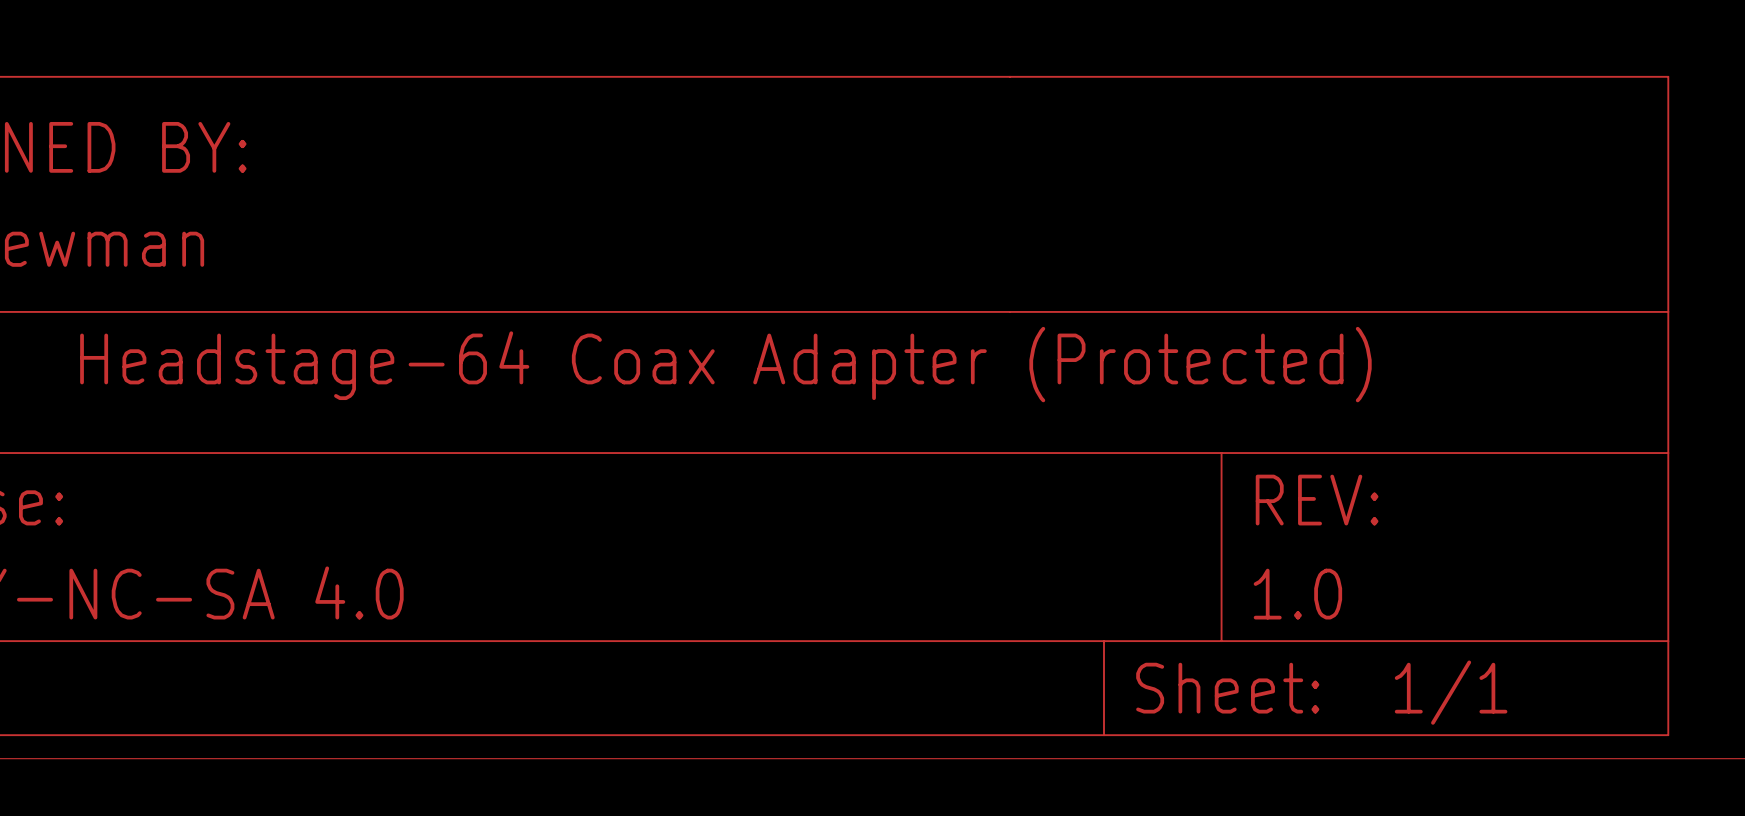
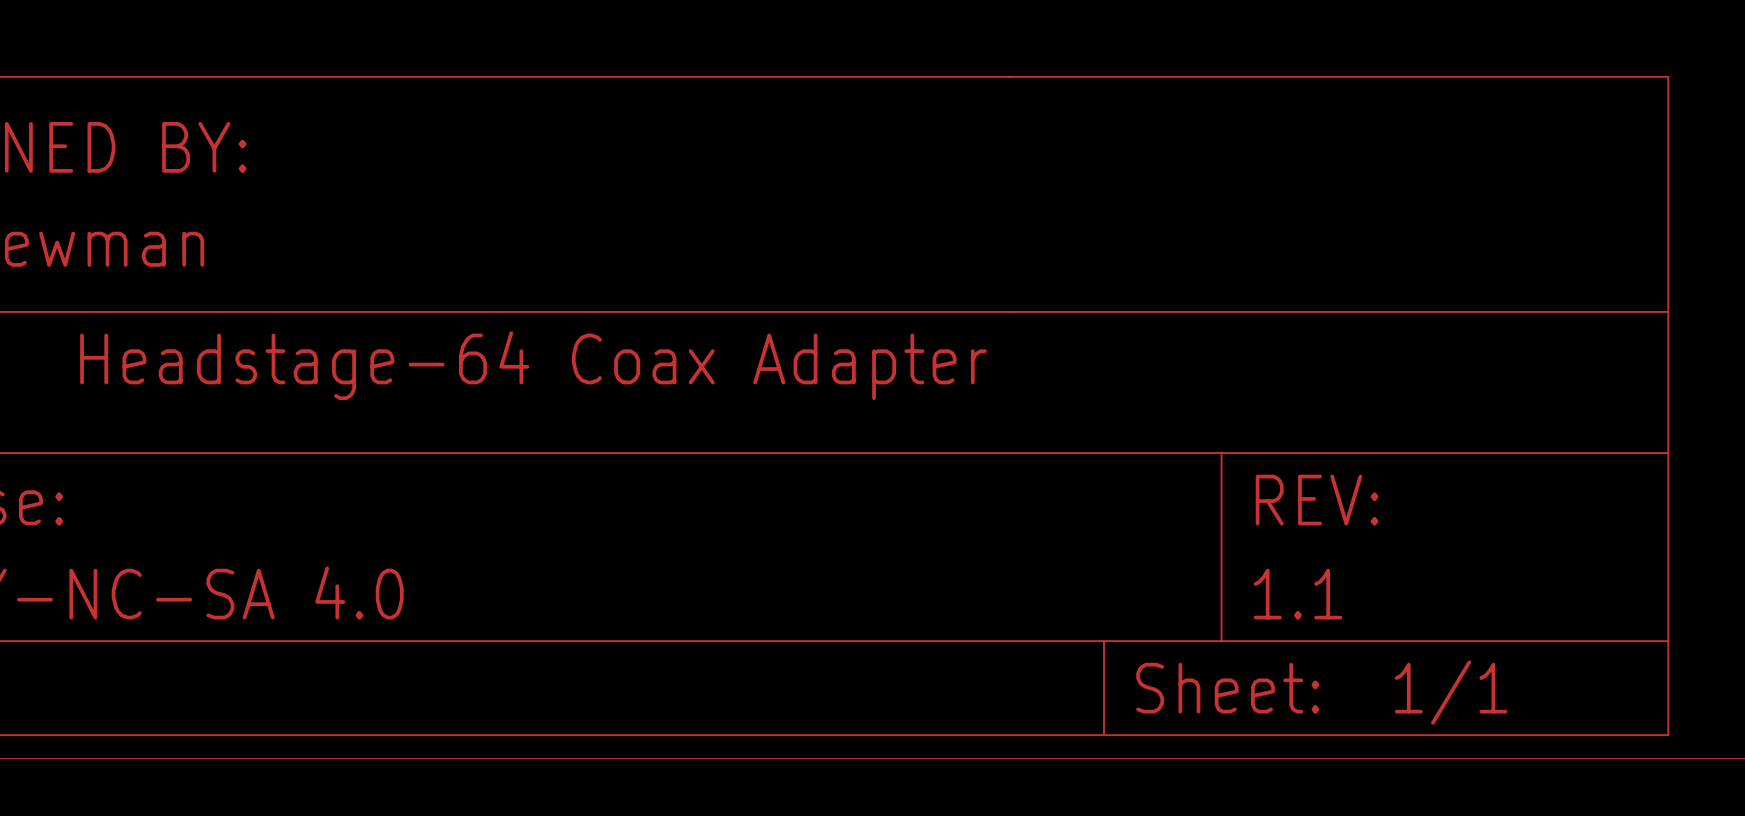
part text: Headstage-64 Coax Adapter (Protected) (725, 364) -> Headstage-64 Coax Adapter (533, 365)
part text: 1.0 (1297, 594) -> 1.1 (1297, 594)

